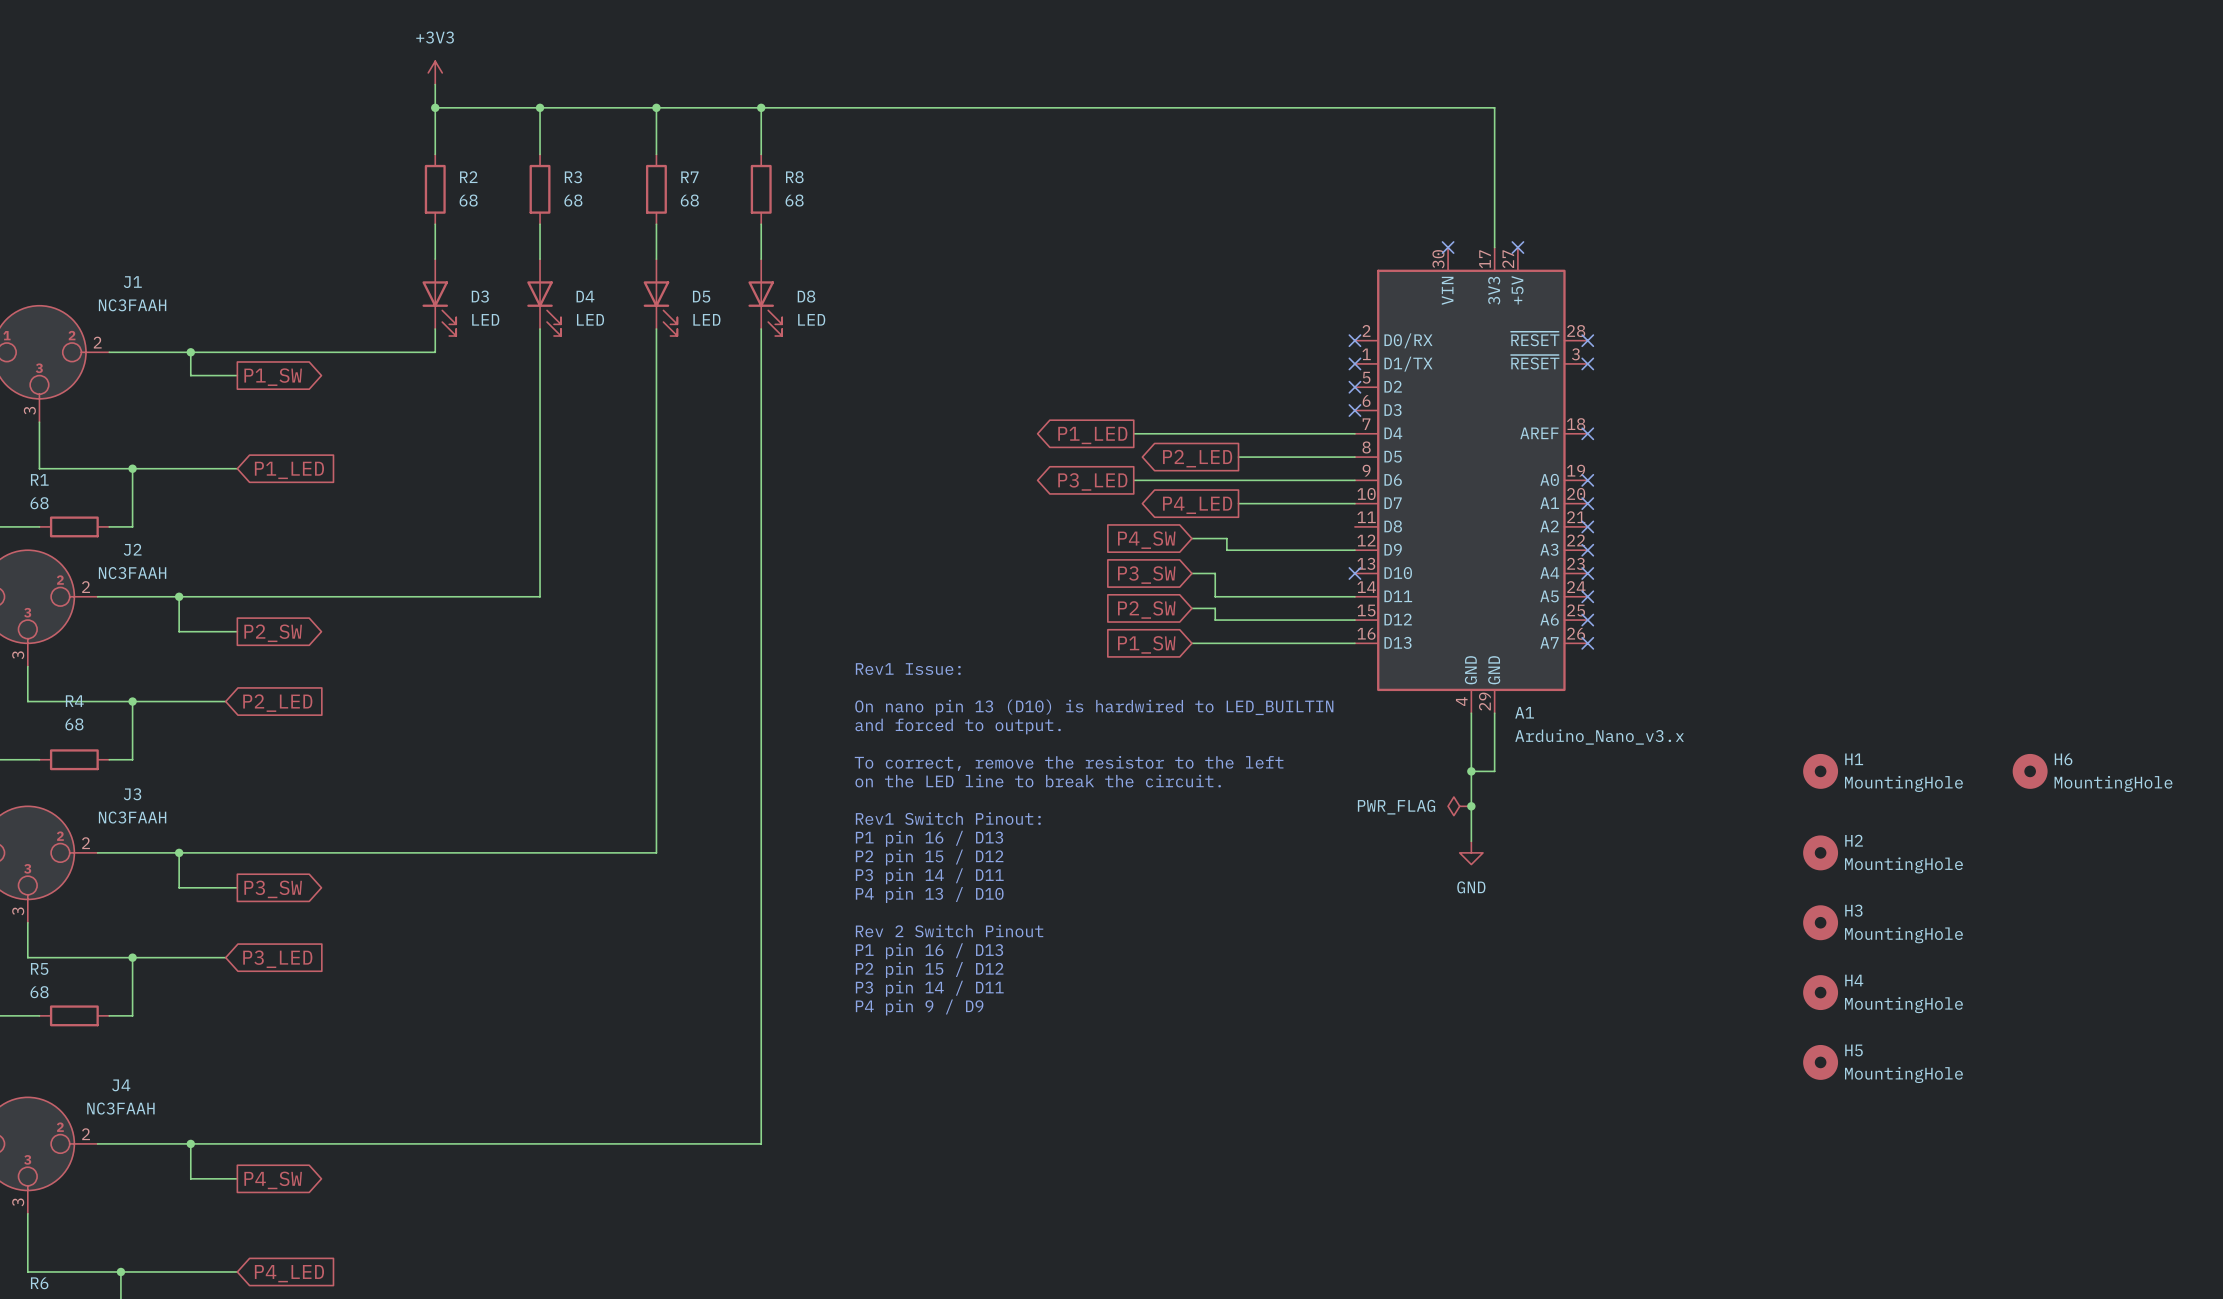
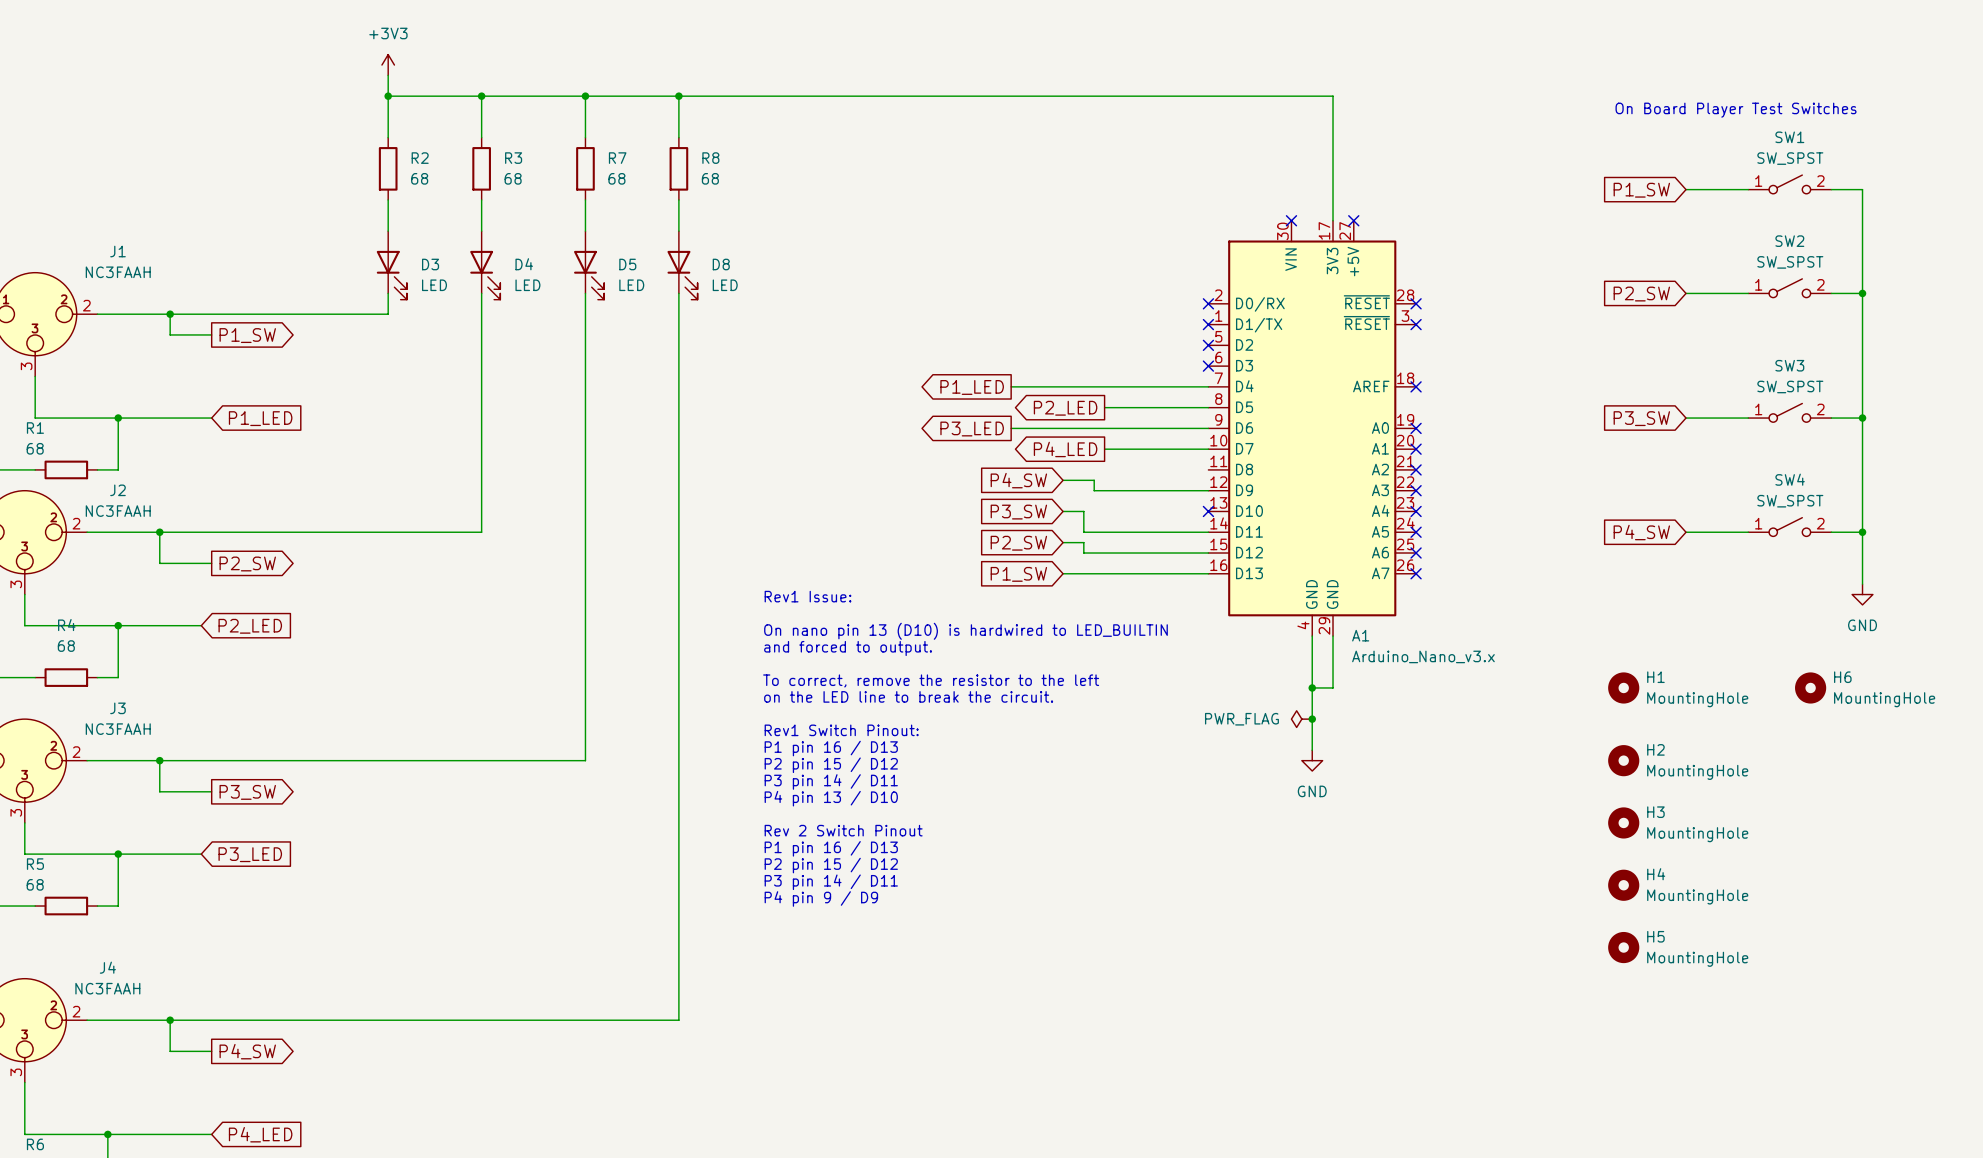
text: none -> On Board Player Test Switches (1736, 110)
SW1: none -> SW_SPST (1789, 184)
wire: none -> (1686, 189) (1748, 189)
wire: none -> (1831, 189) (1862, 189) (1862, 584)
global label: none -> P1_SW (1641, 190)
SW2: none -> SW_SPST (1789, 288)
wire: none -> (1686, 293) (1748, 293)
wire: none -> (1831, 293) (1862, 293)
junction: none -> (1862, 293)
global label: none -> P2_SW (1641, 294)
SW3: none -> SW_SPST (1789, 412)
wire: none -> (1686, 418) (1748, 418)
wire: none -> (1831, 418) (1862, 418)
junction: none -> (1862, 418)
global label: none -> P3_SW (1641, 418)
SW4: none -> SW_SPST (1789, 527)
wire: none -> (1686, 532) (1748, 532)
wire: none -> (1831, 532) (1862, 532)
junction: none -> (1862, 532)
global label: none -> P4_SW (1641, 532)
power symbol: none -> GND (1862, 594)

